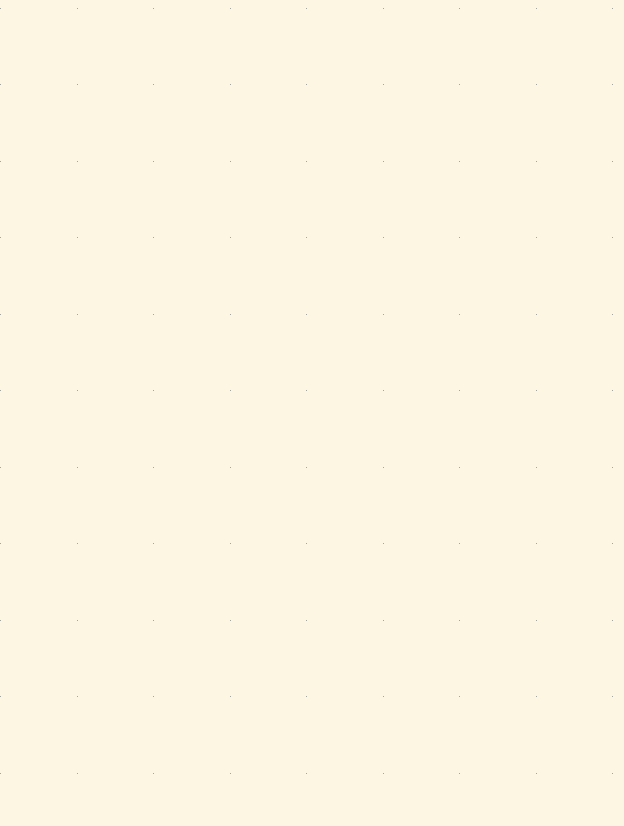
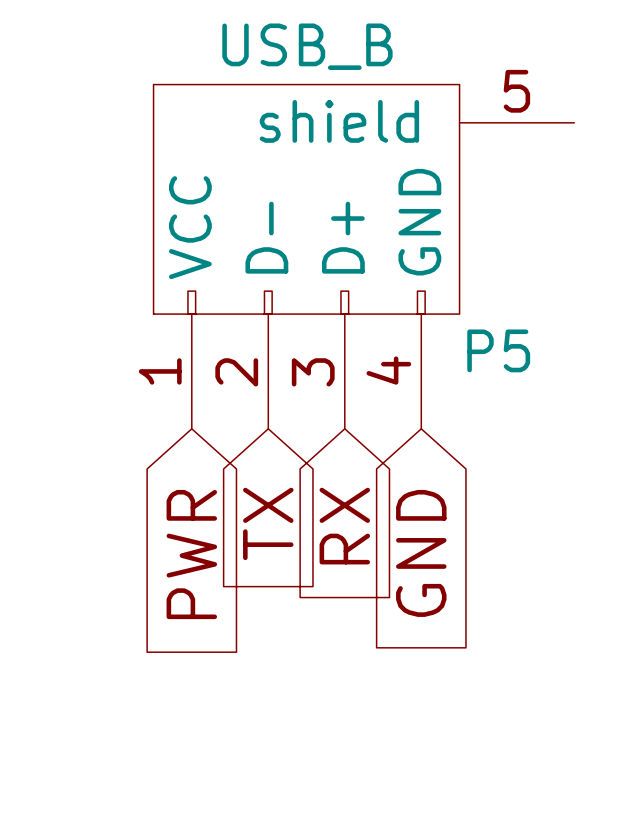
P5: none -> USB_B (363, 256)
global label: none -> TX (268, 523)
global label: none -> RX (344, 526)
global label: none -> GND (421, 553)
global label: none -> PWR (191, 554)

